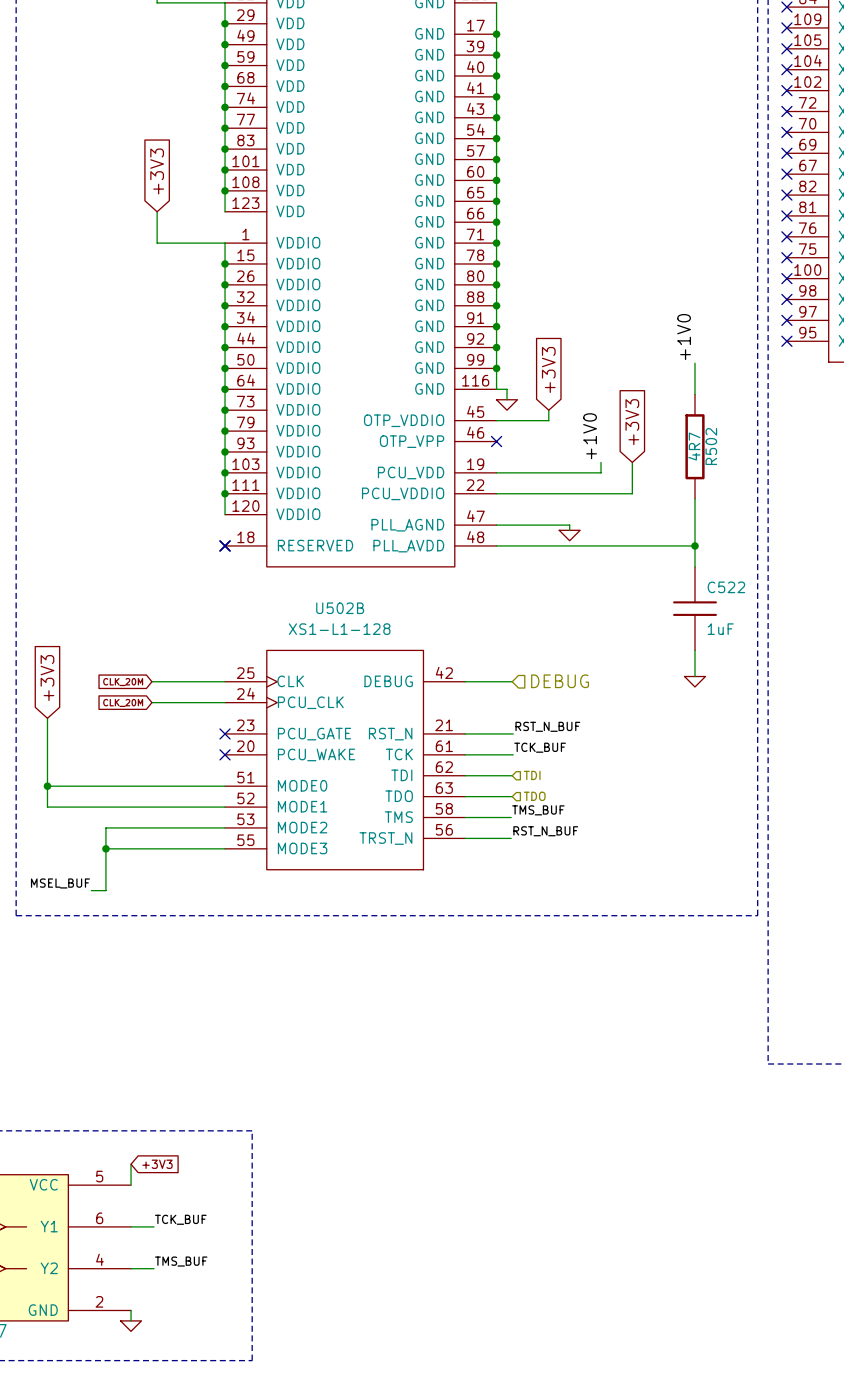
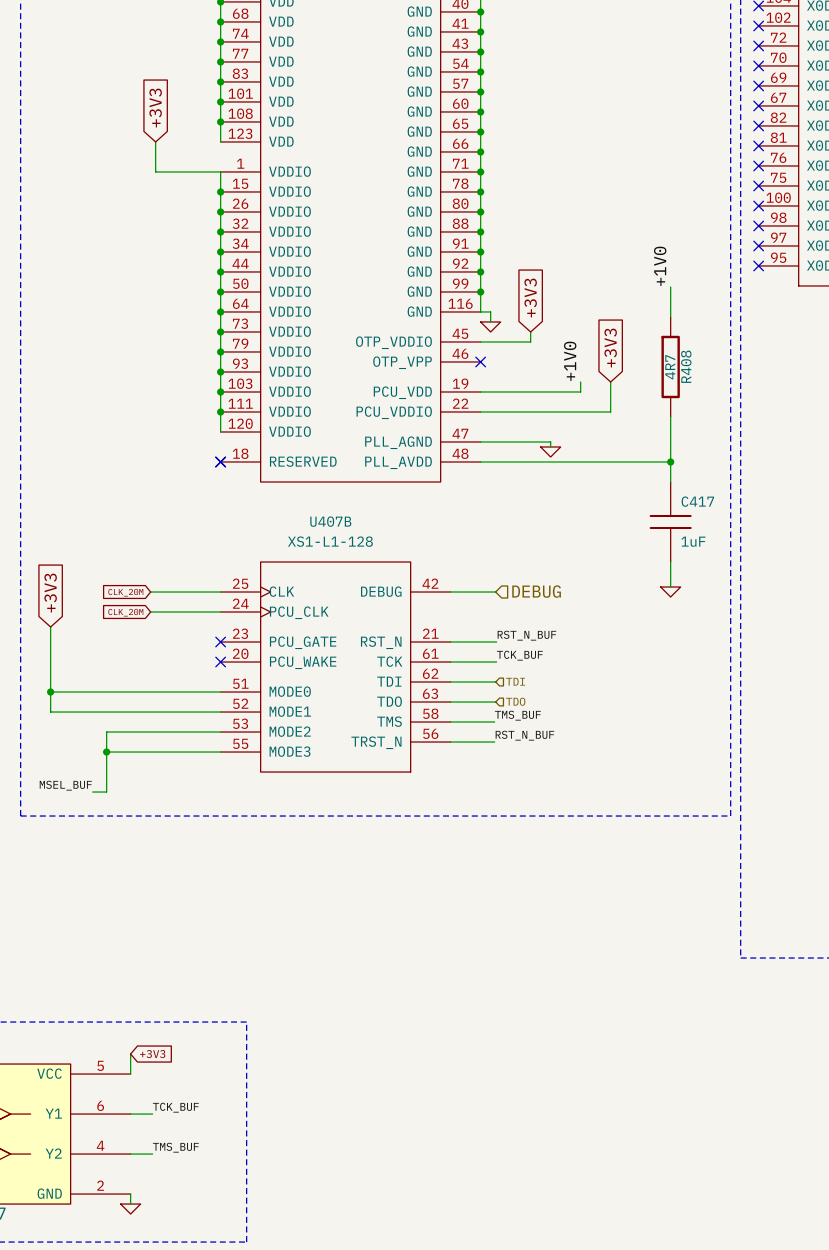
R502 name: R502 (711, 446) -> R408 (686, 366)
C522 name: C522 (726, 587) -> C417 (697, 501)
U502B name: U502B (340, 608) -> U407B (330, 521)

